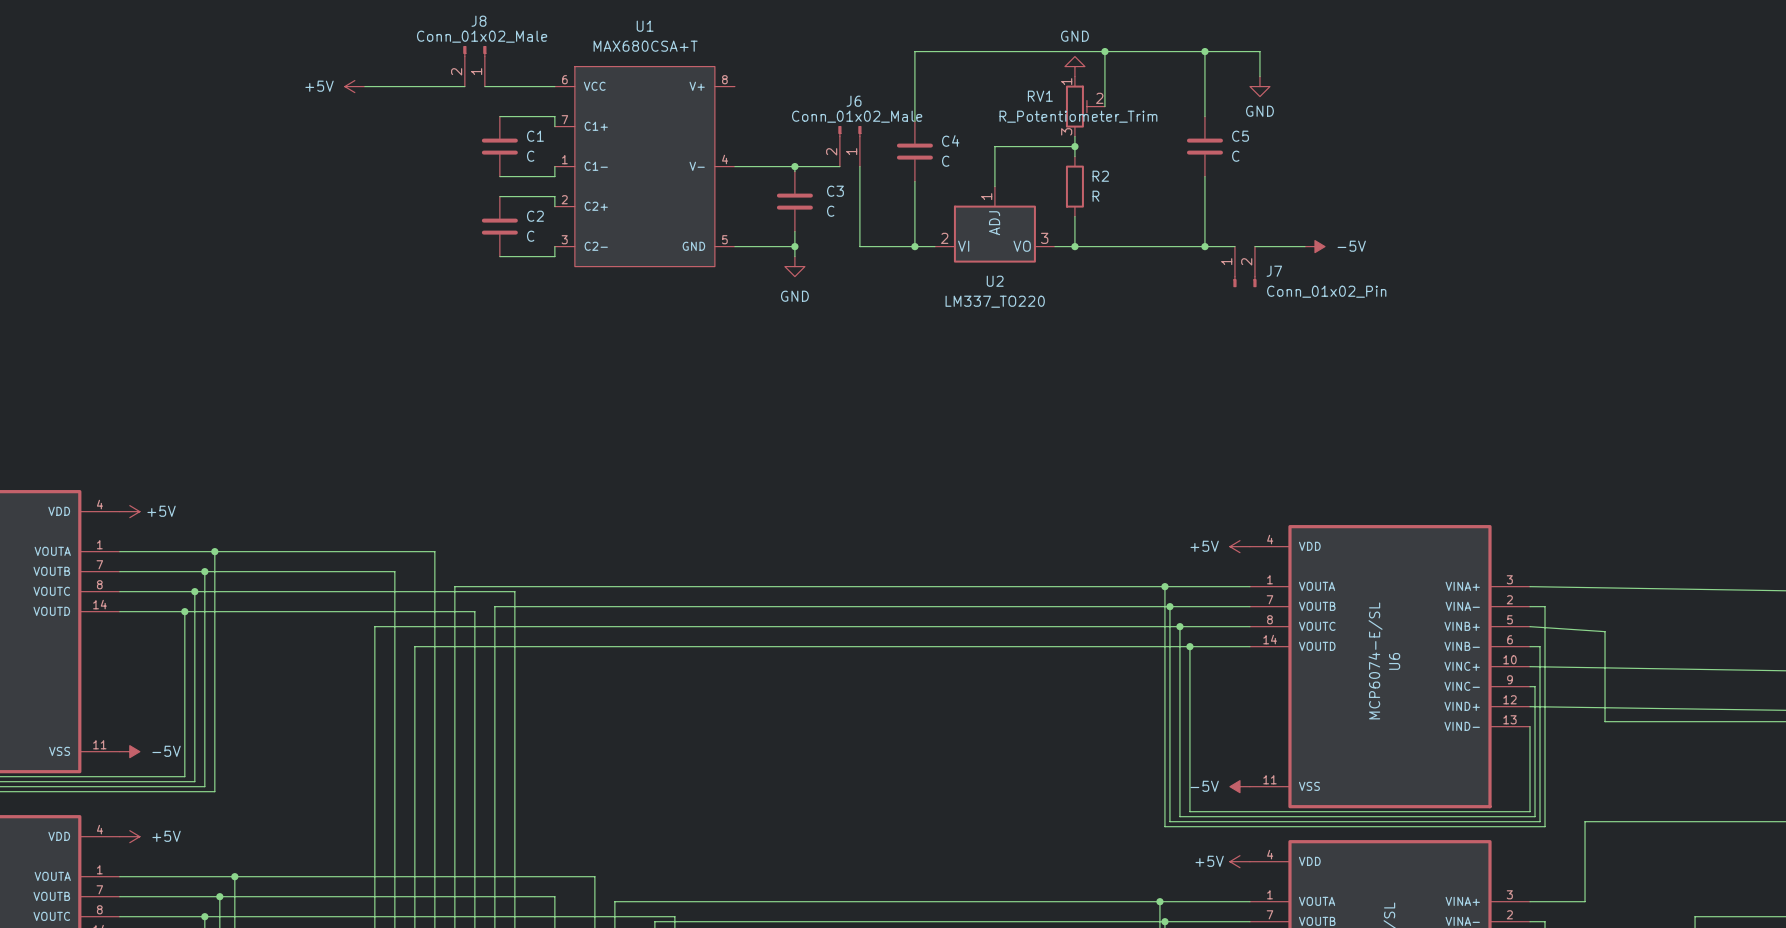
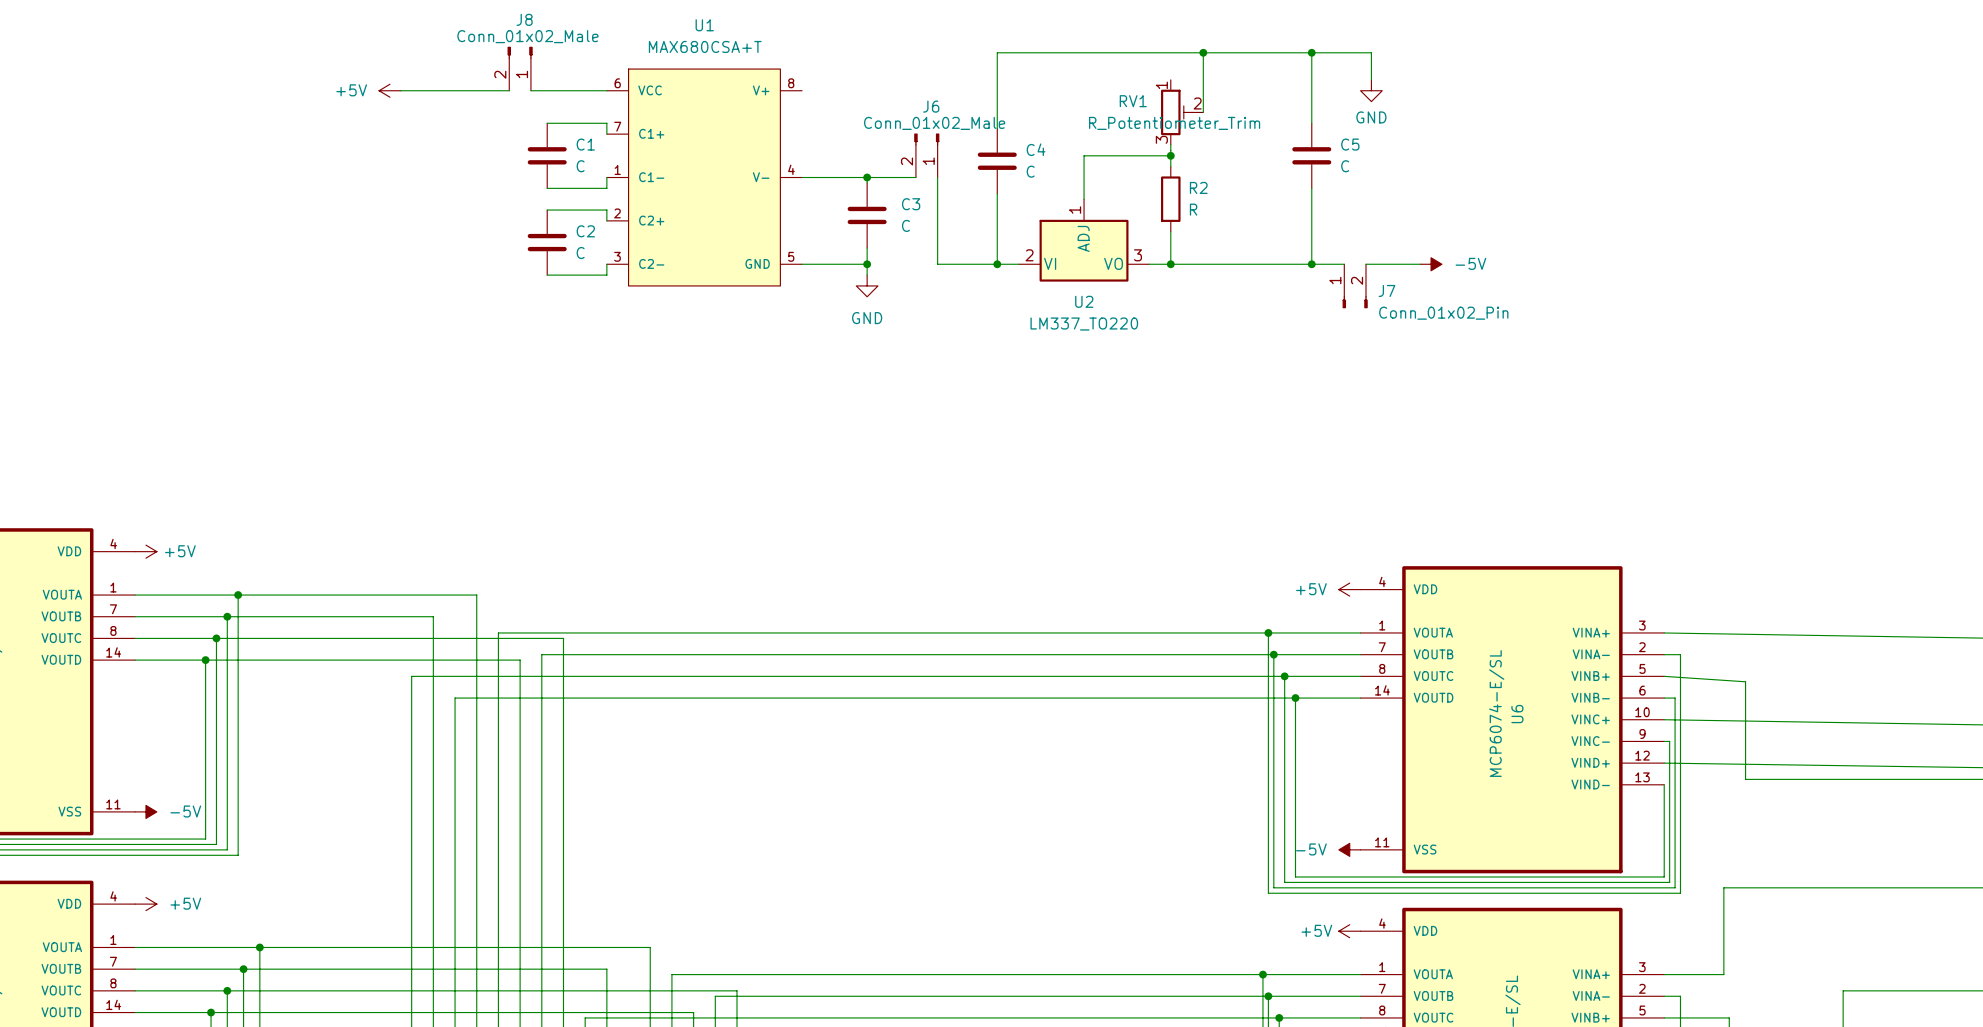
power symbol: GND (1074, 66) -> none

